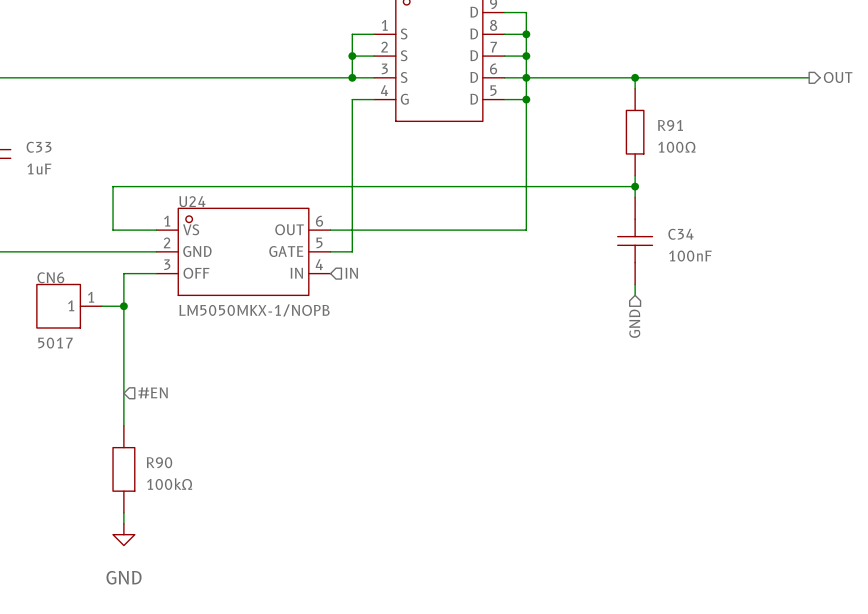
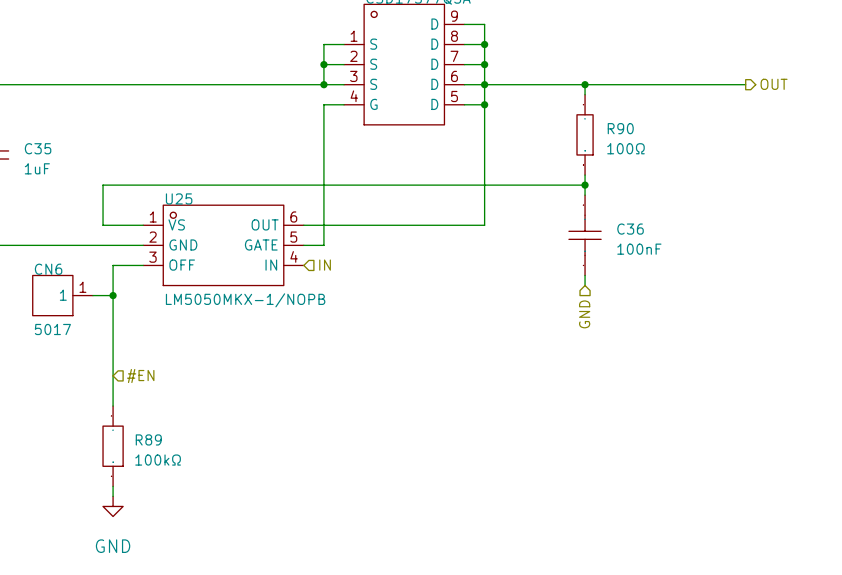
R91 name: R91 (670, 125) -> R90 (620, 128)
C33 name: C33 (39, 147) -> C35 (38, 148)
U24 name: U24 (192, 201) -> U25 (179, 198)
C34 name: C34 (680, 234) -> C36 (630, 229)
R90 name: R90 (159, 462) -> R89 (148, 439)

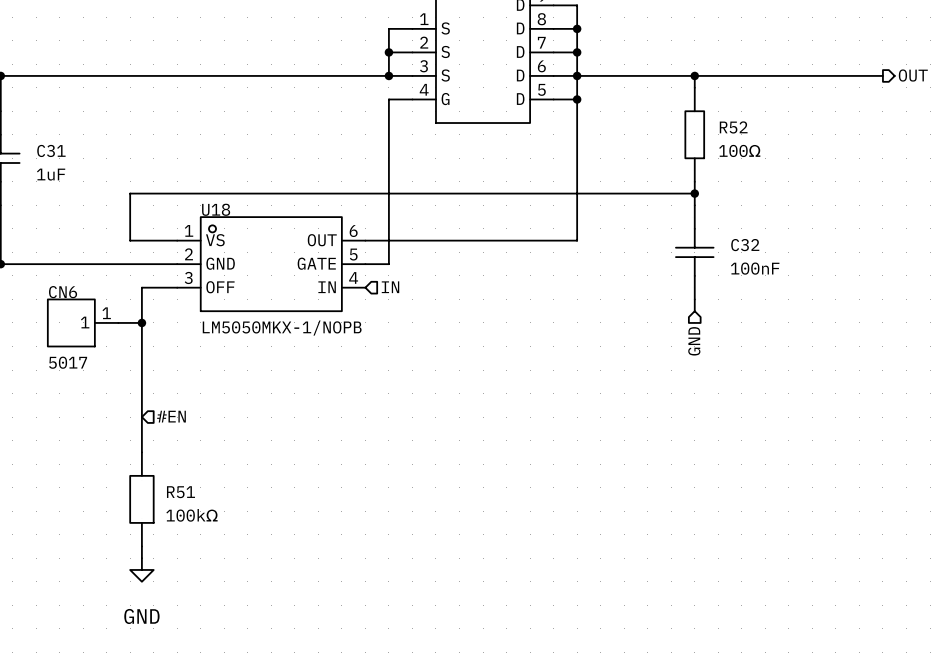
R90 name: R90 (620, 128) -> R52 (733, 127)
C35 name: C35 (38, 148) -> C31 (51, 150)
U25 name: U25 (179, 198) -> U18 (216, 209)
C36 name: C36 (630, 229) -> C32 (745, 245)
R89 name: R89 (148, 439) -> R51 (180, 492)

